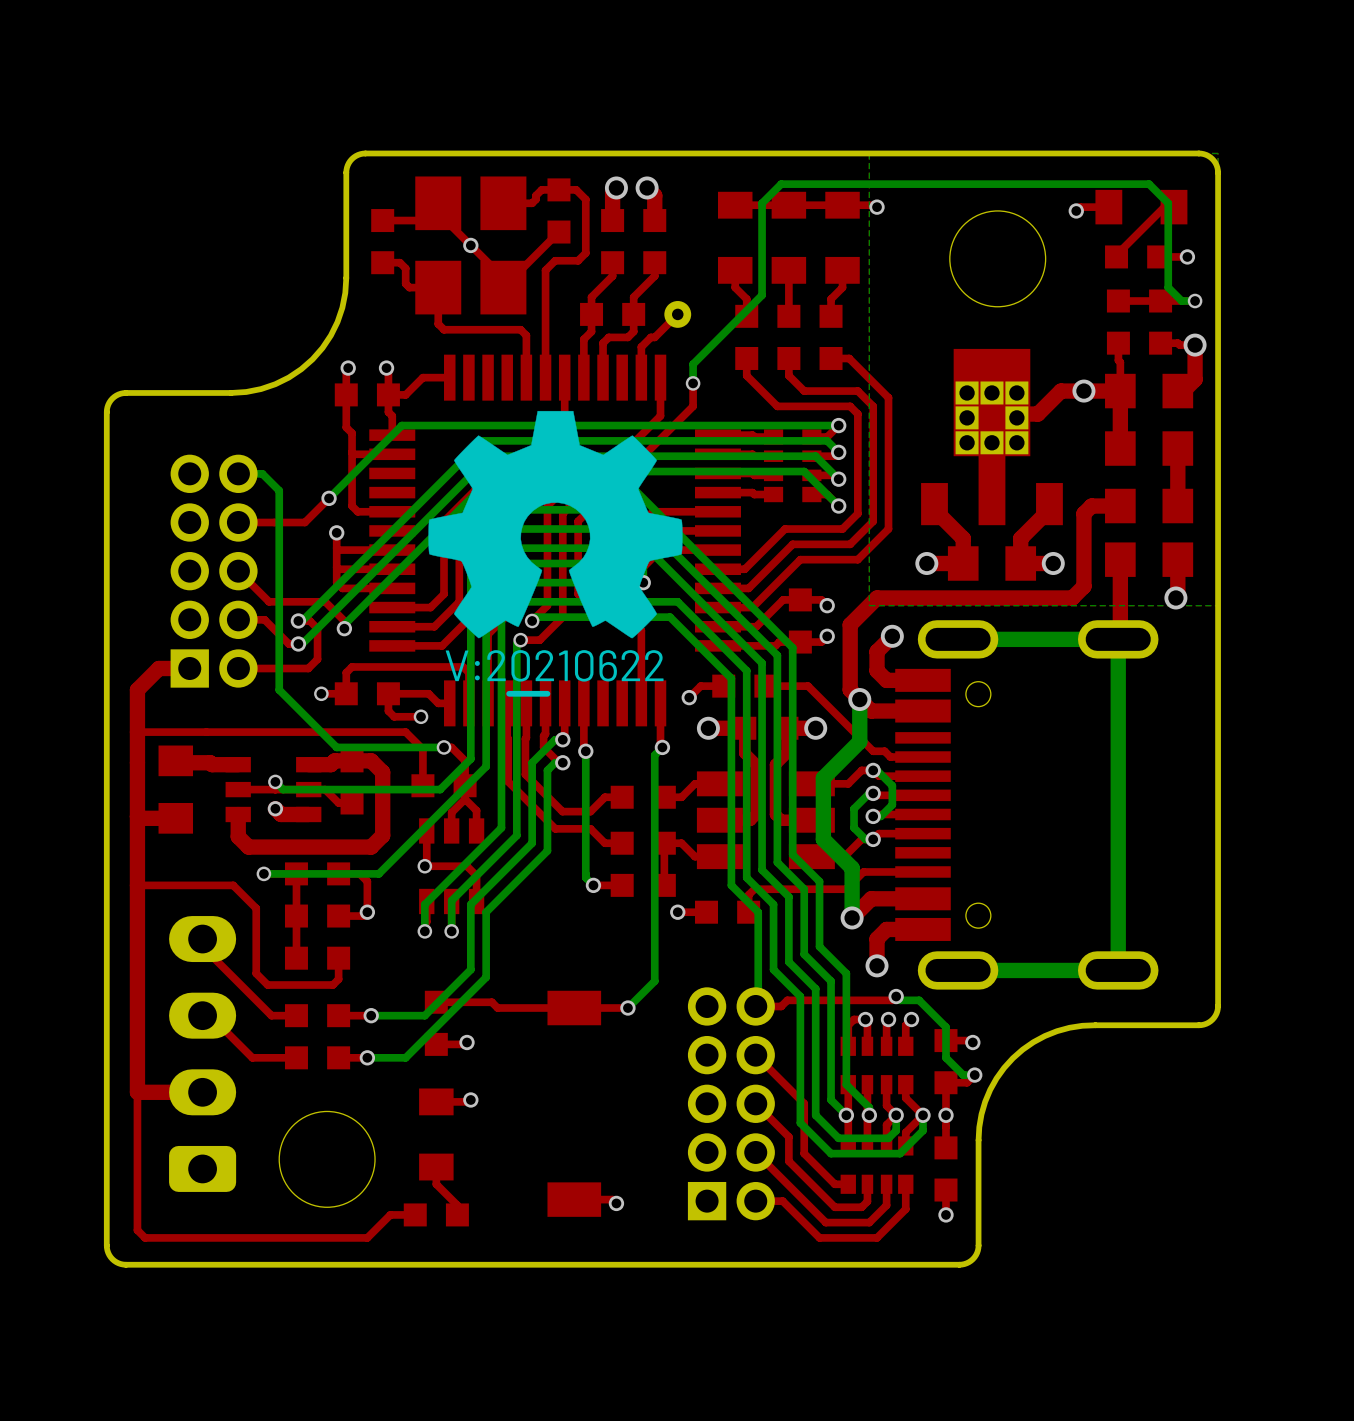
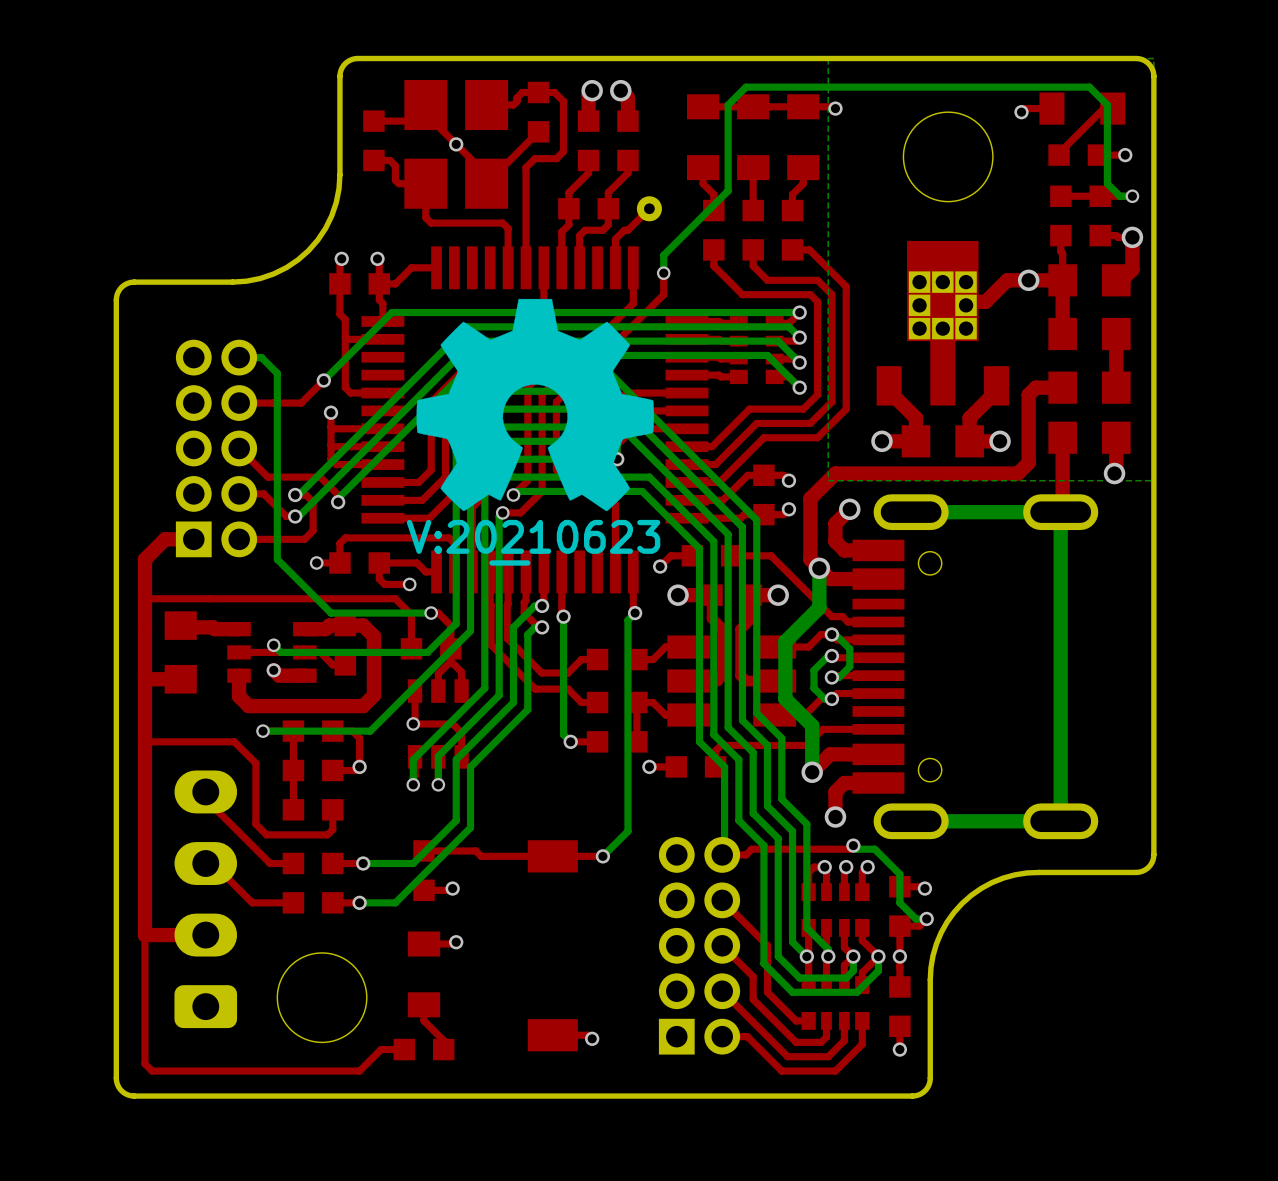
drawing shape: [445, 650, 664, 697] -> [406, 519, 661, 566]

